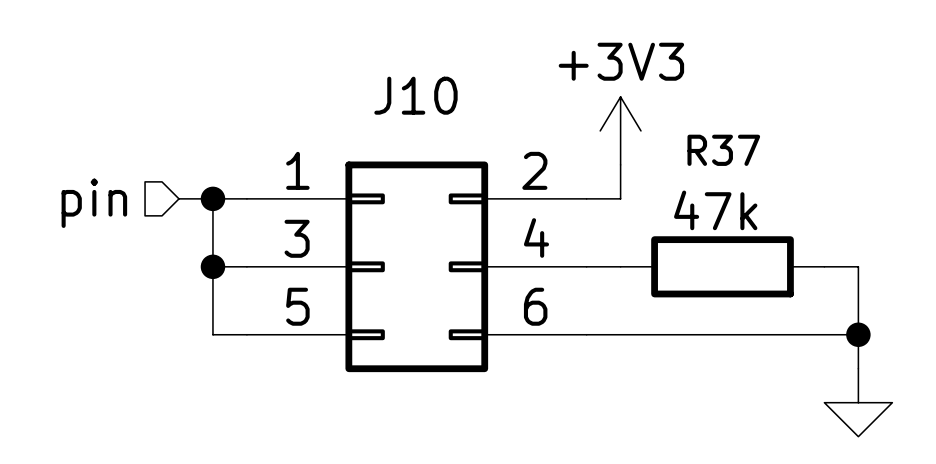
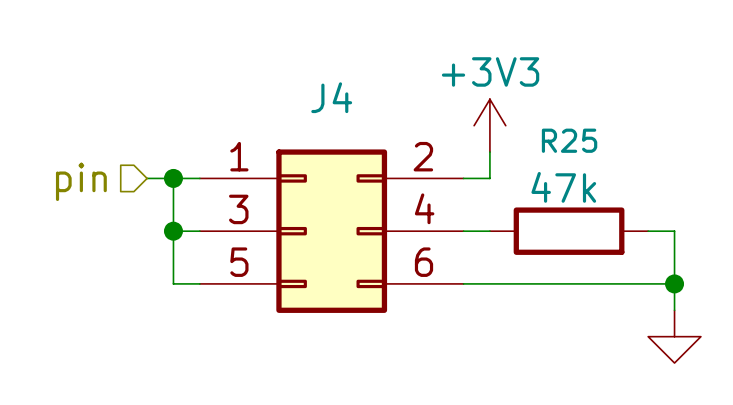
J10 name: J10 (415, 95) -> J4 (331, 97)
R37 name: R37 (723, 150) -> R25 (569, 140)

